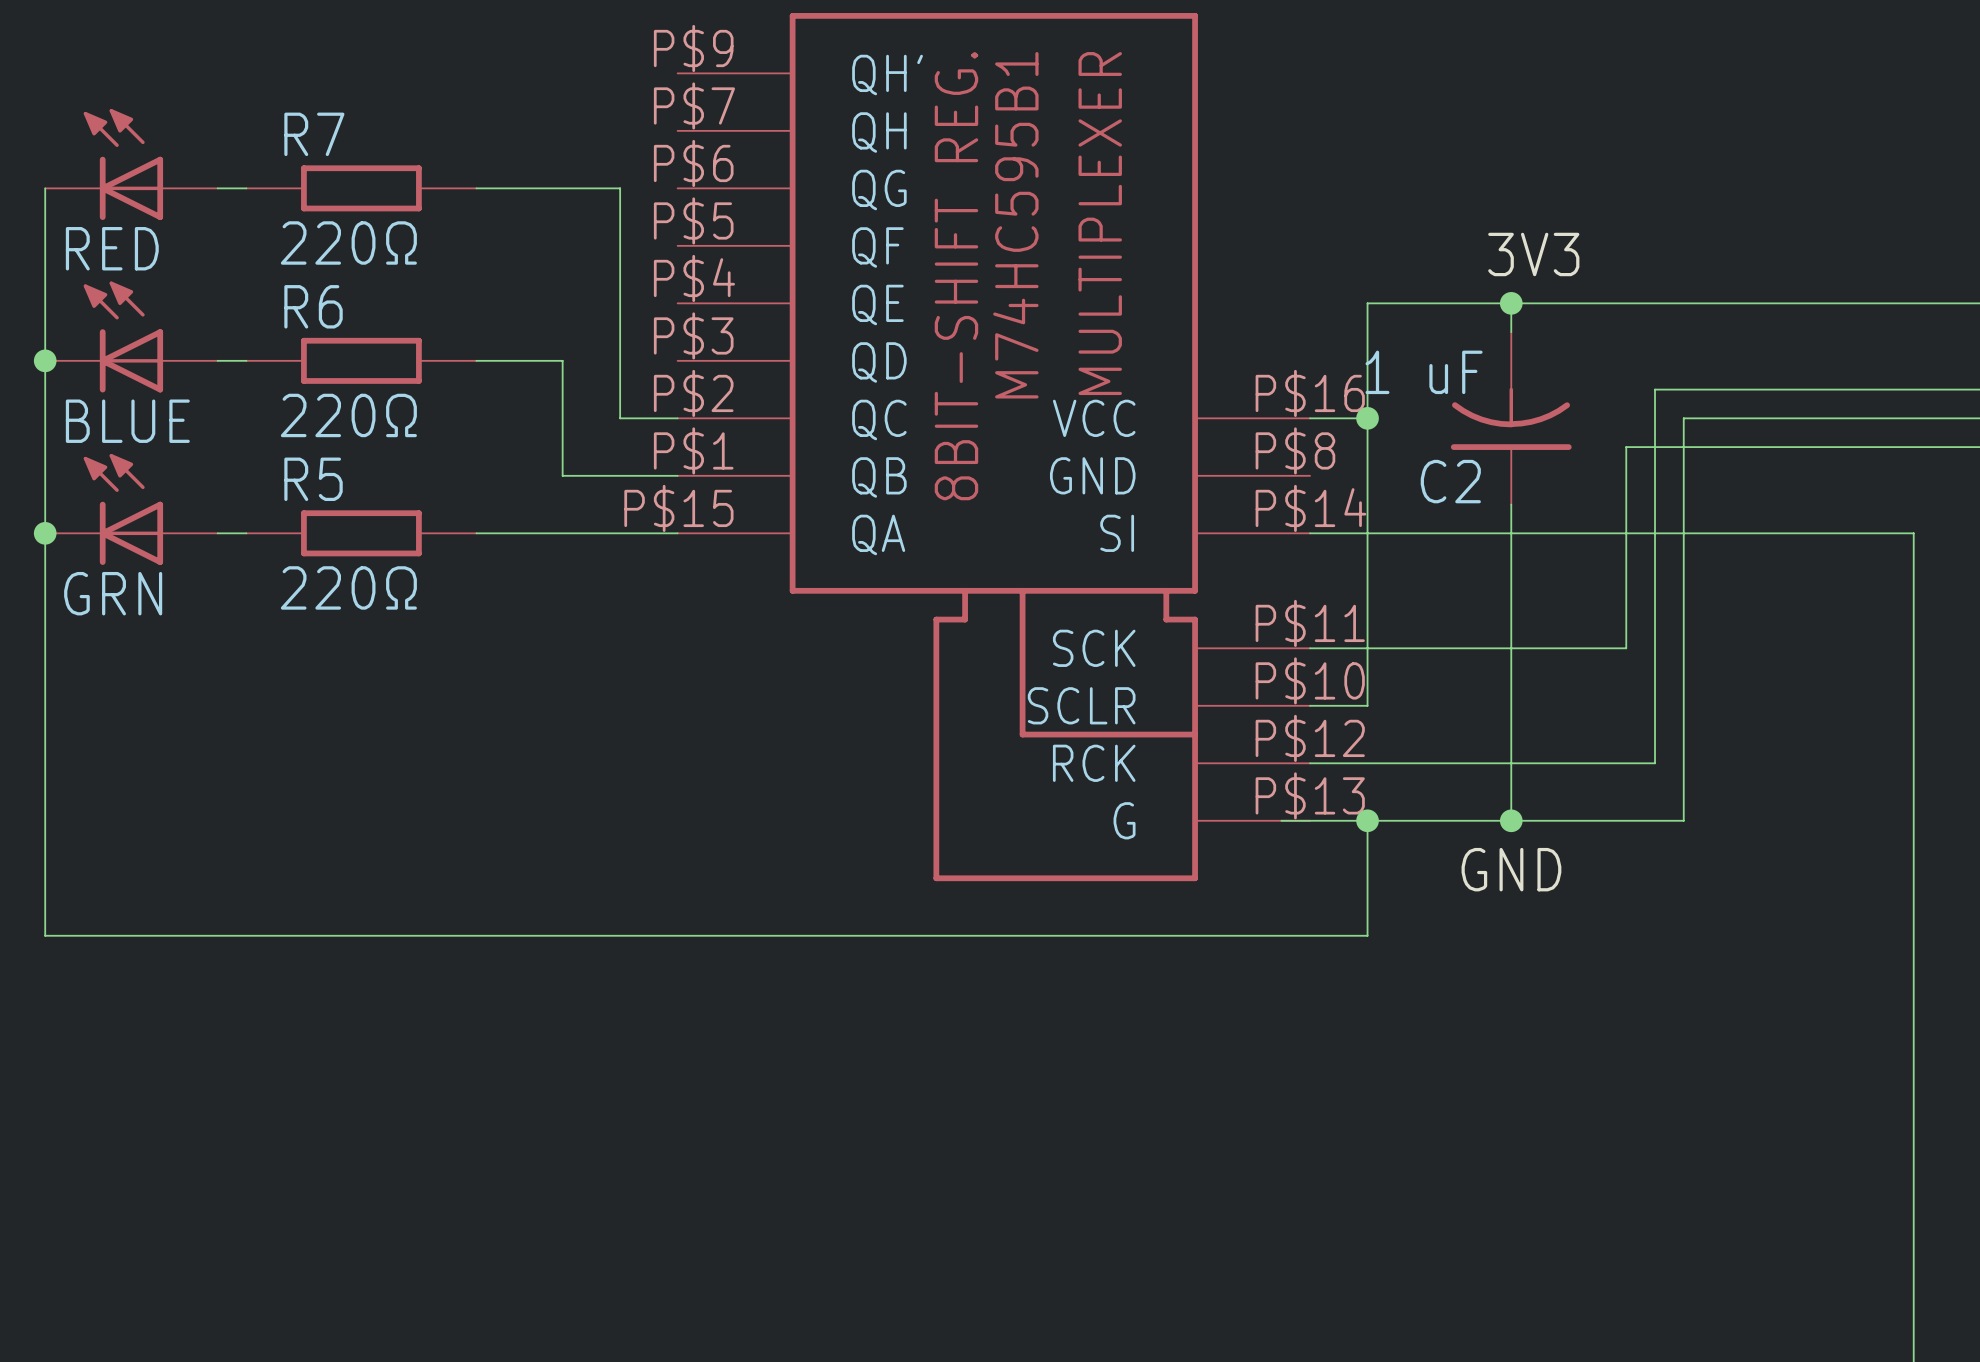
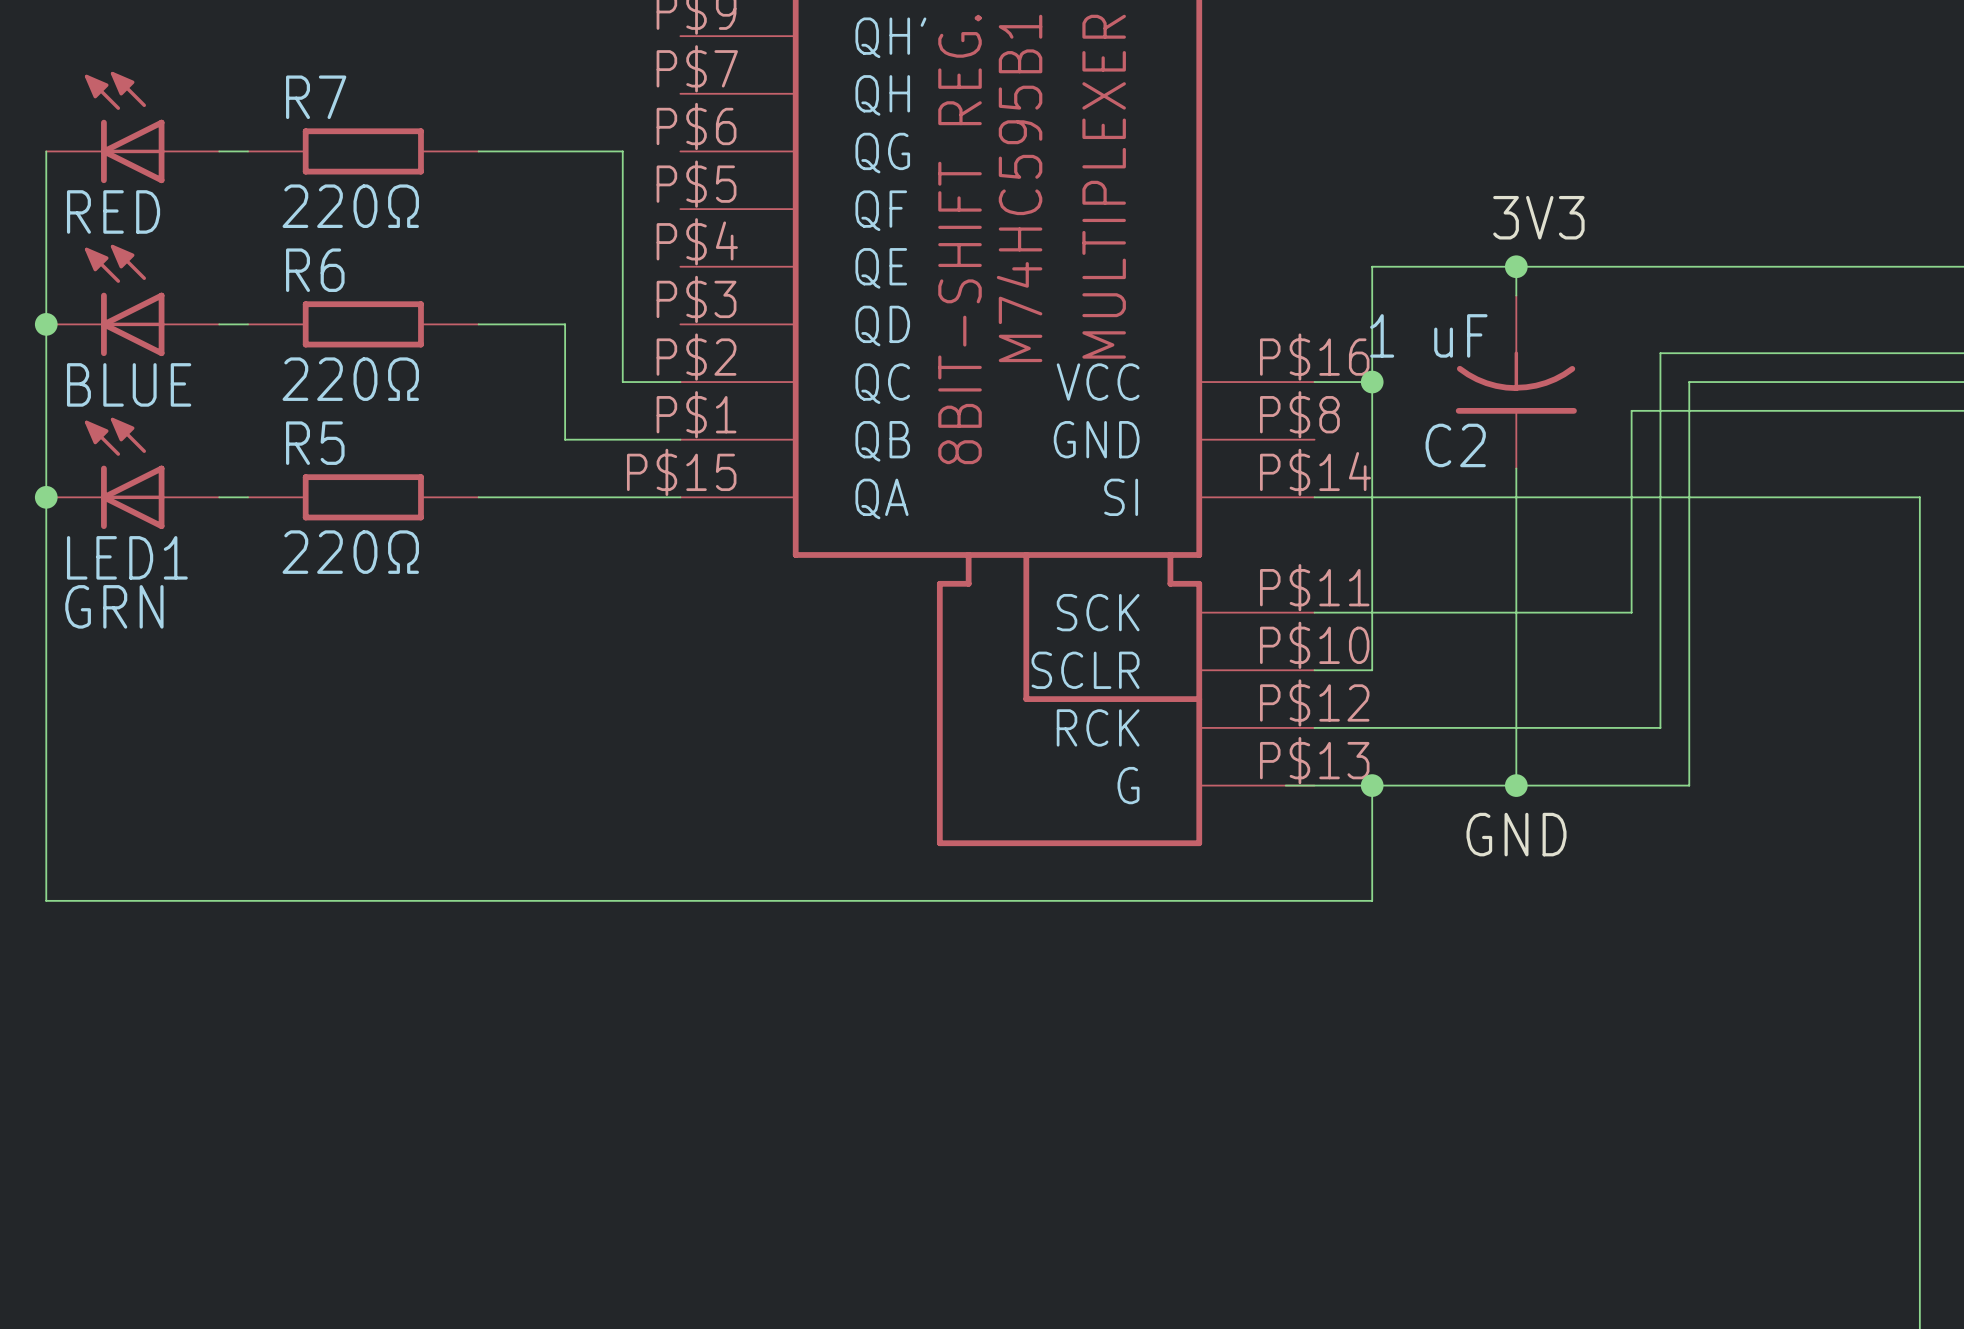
GRN name: GRN (113, 593) -> LED1 (127, 557)
GRN value: none -> GRN (114, 606)

